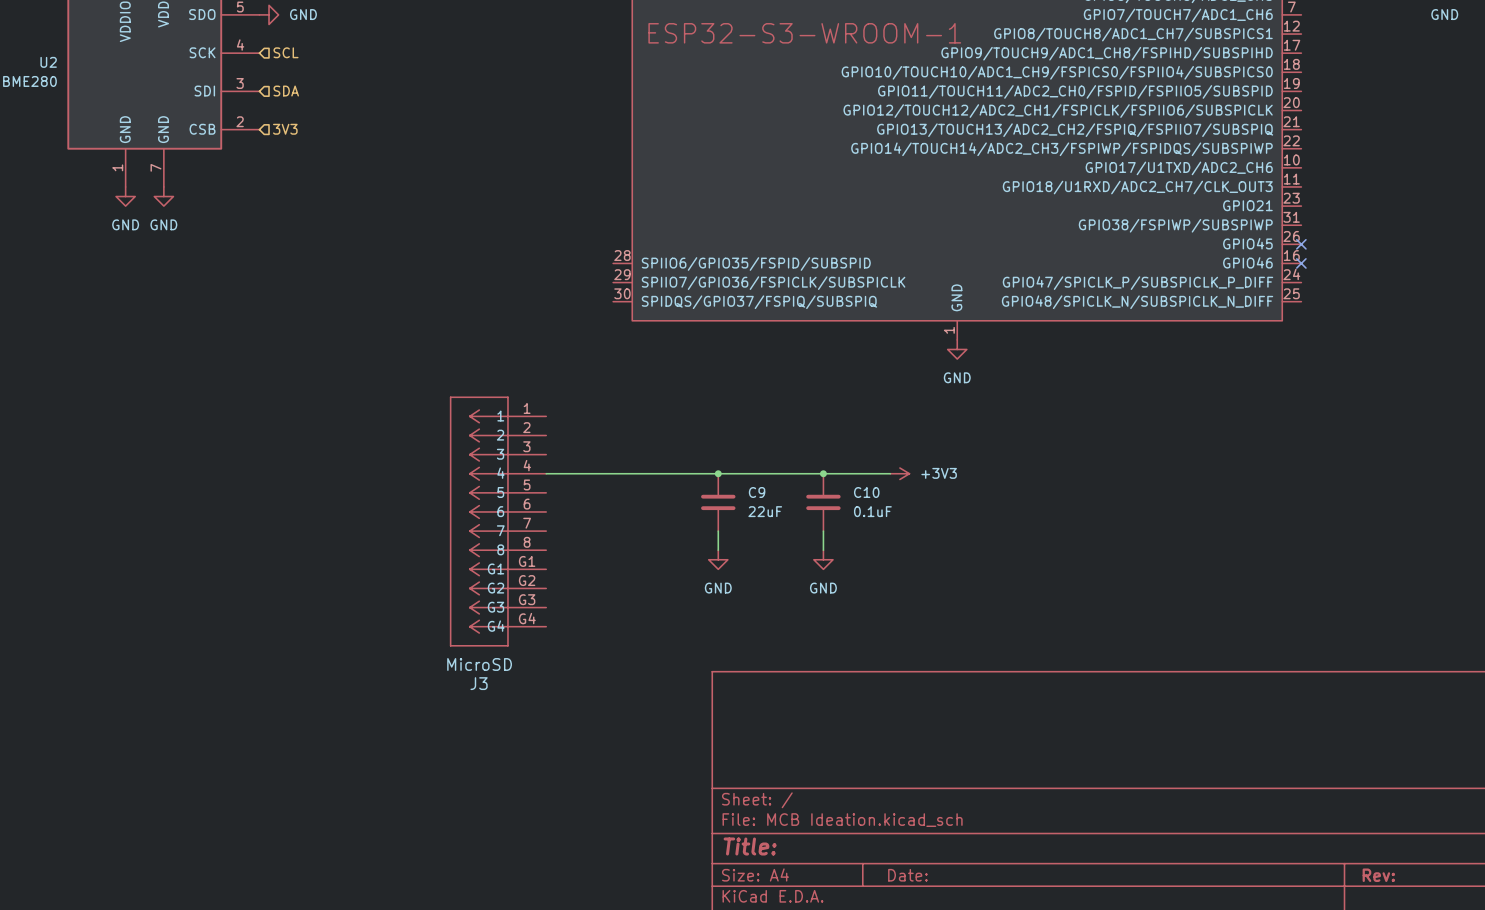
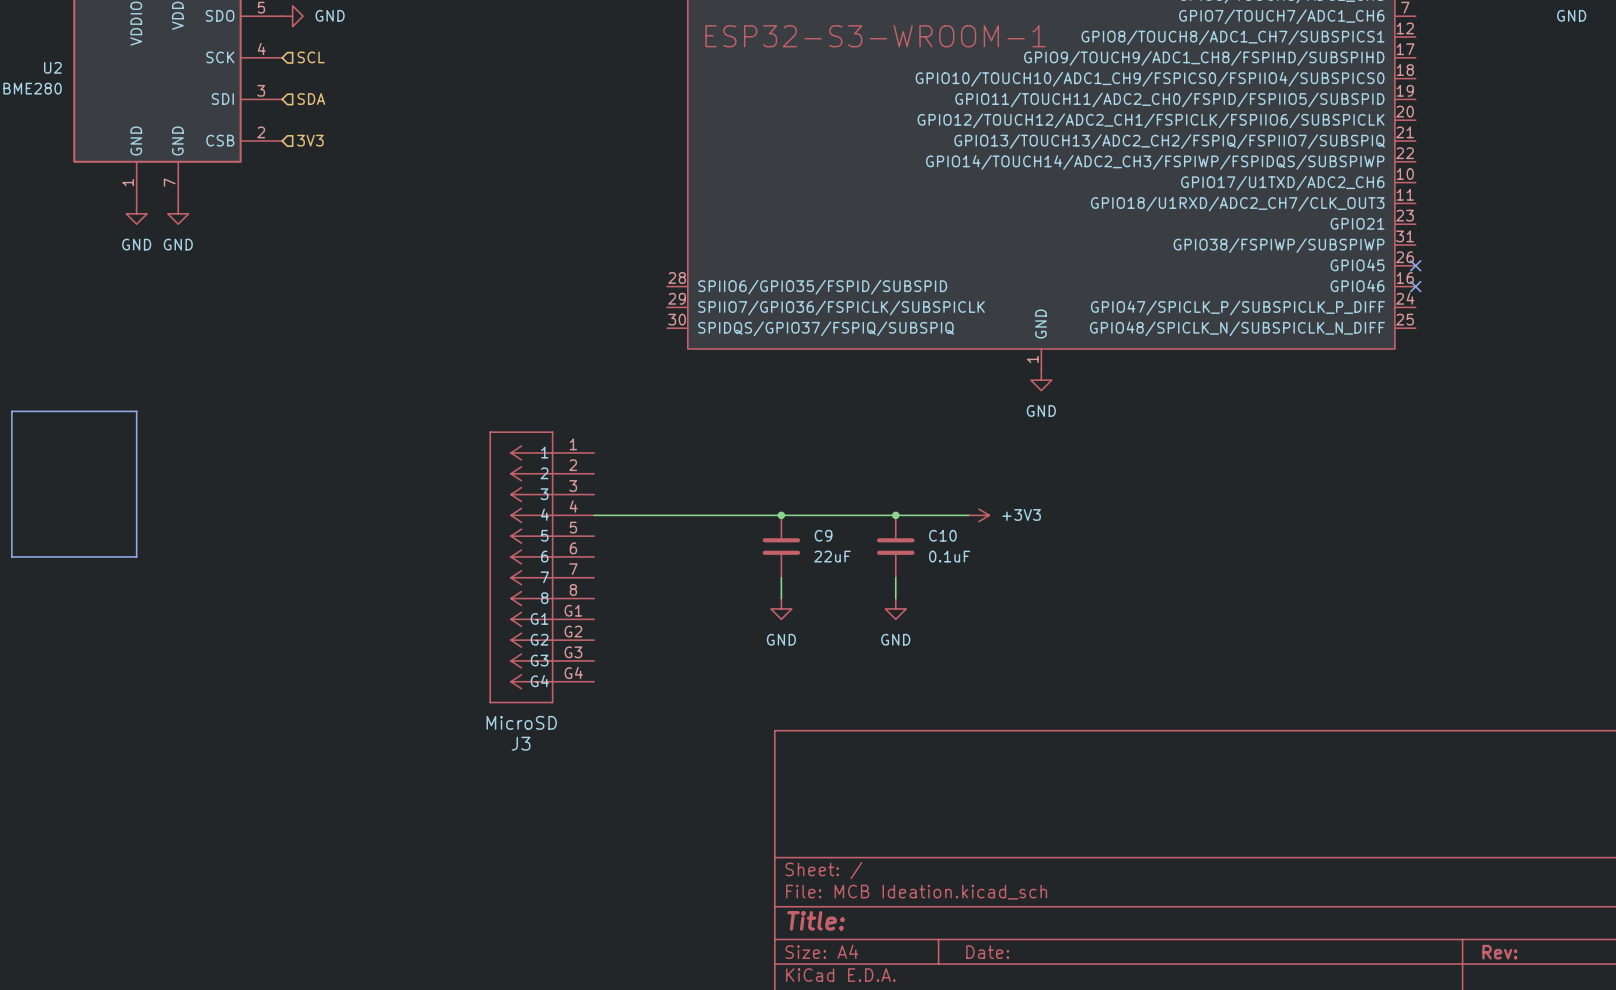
line: none -> (11, 411) (136, 411) (136, 556) (11, 556) (11, 411)

